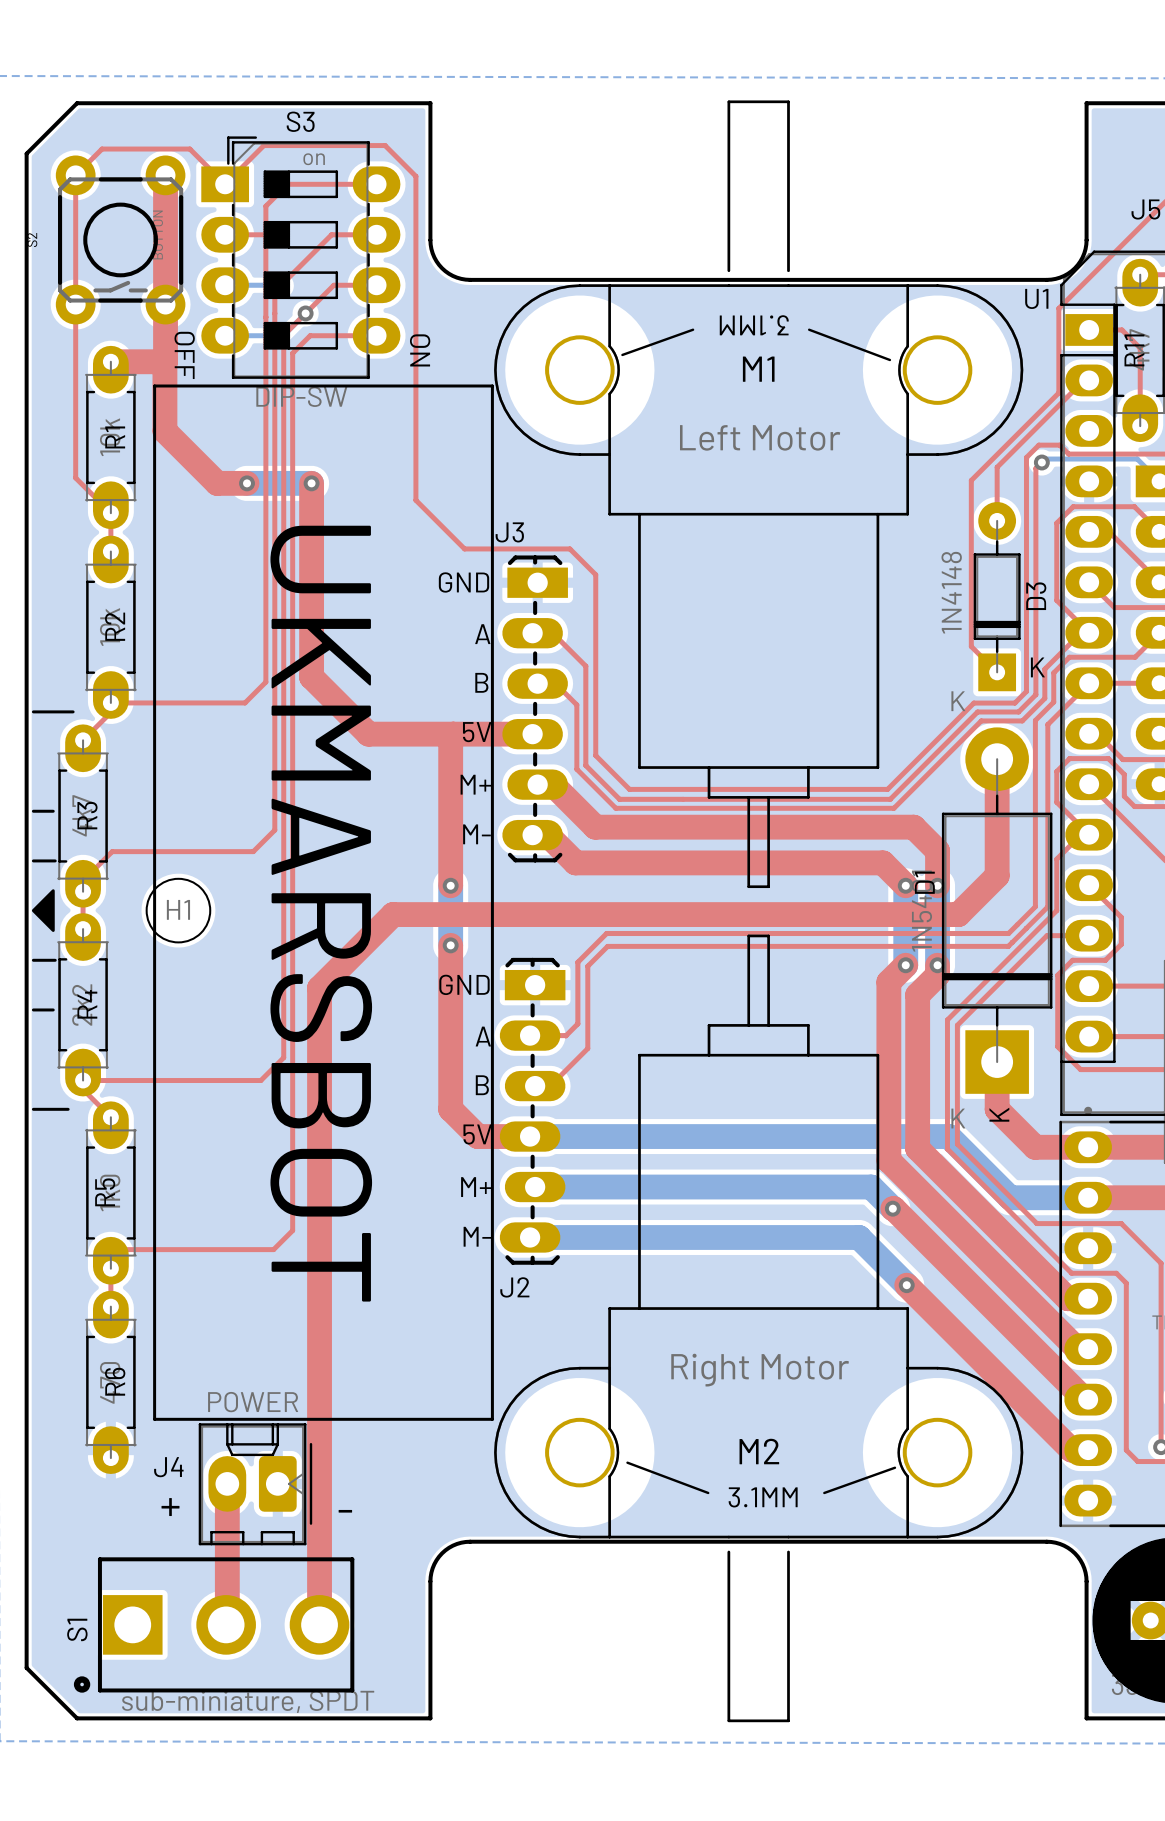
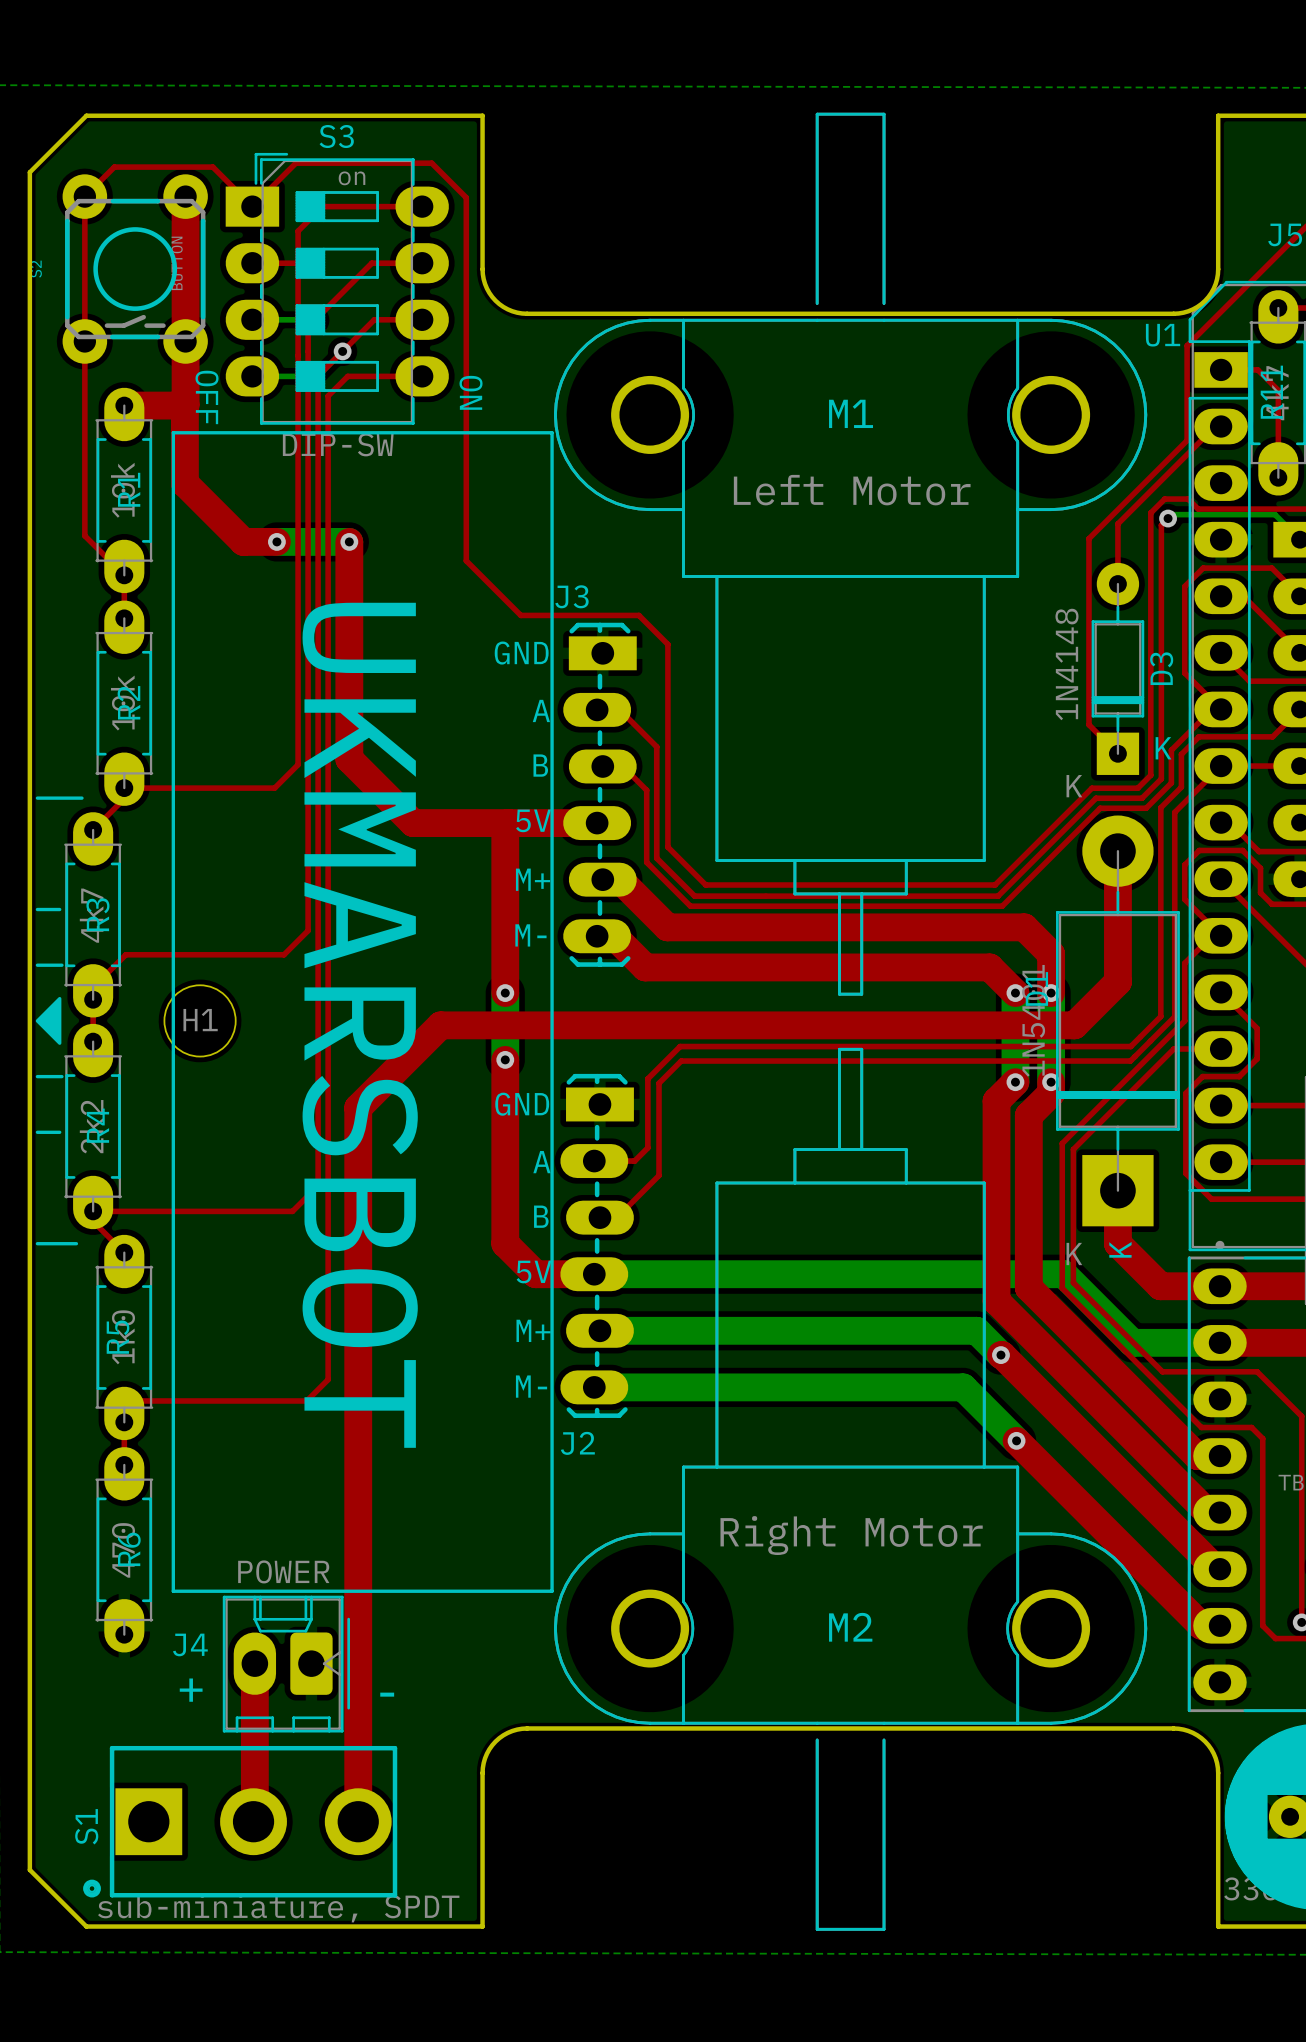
M1 footprint: [494, 100, 1024, 889] -> [553, 112, 1148, 996]
M2 footprint: [494, 934, 1024, 1723] -> [553, 1047, 1148, 1931]

